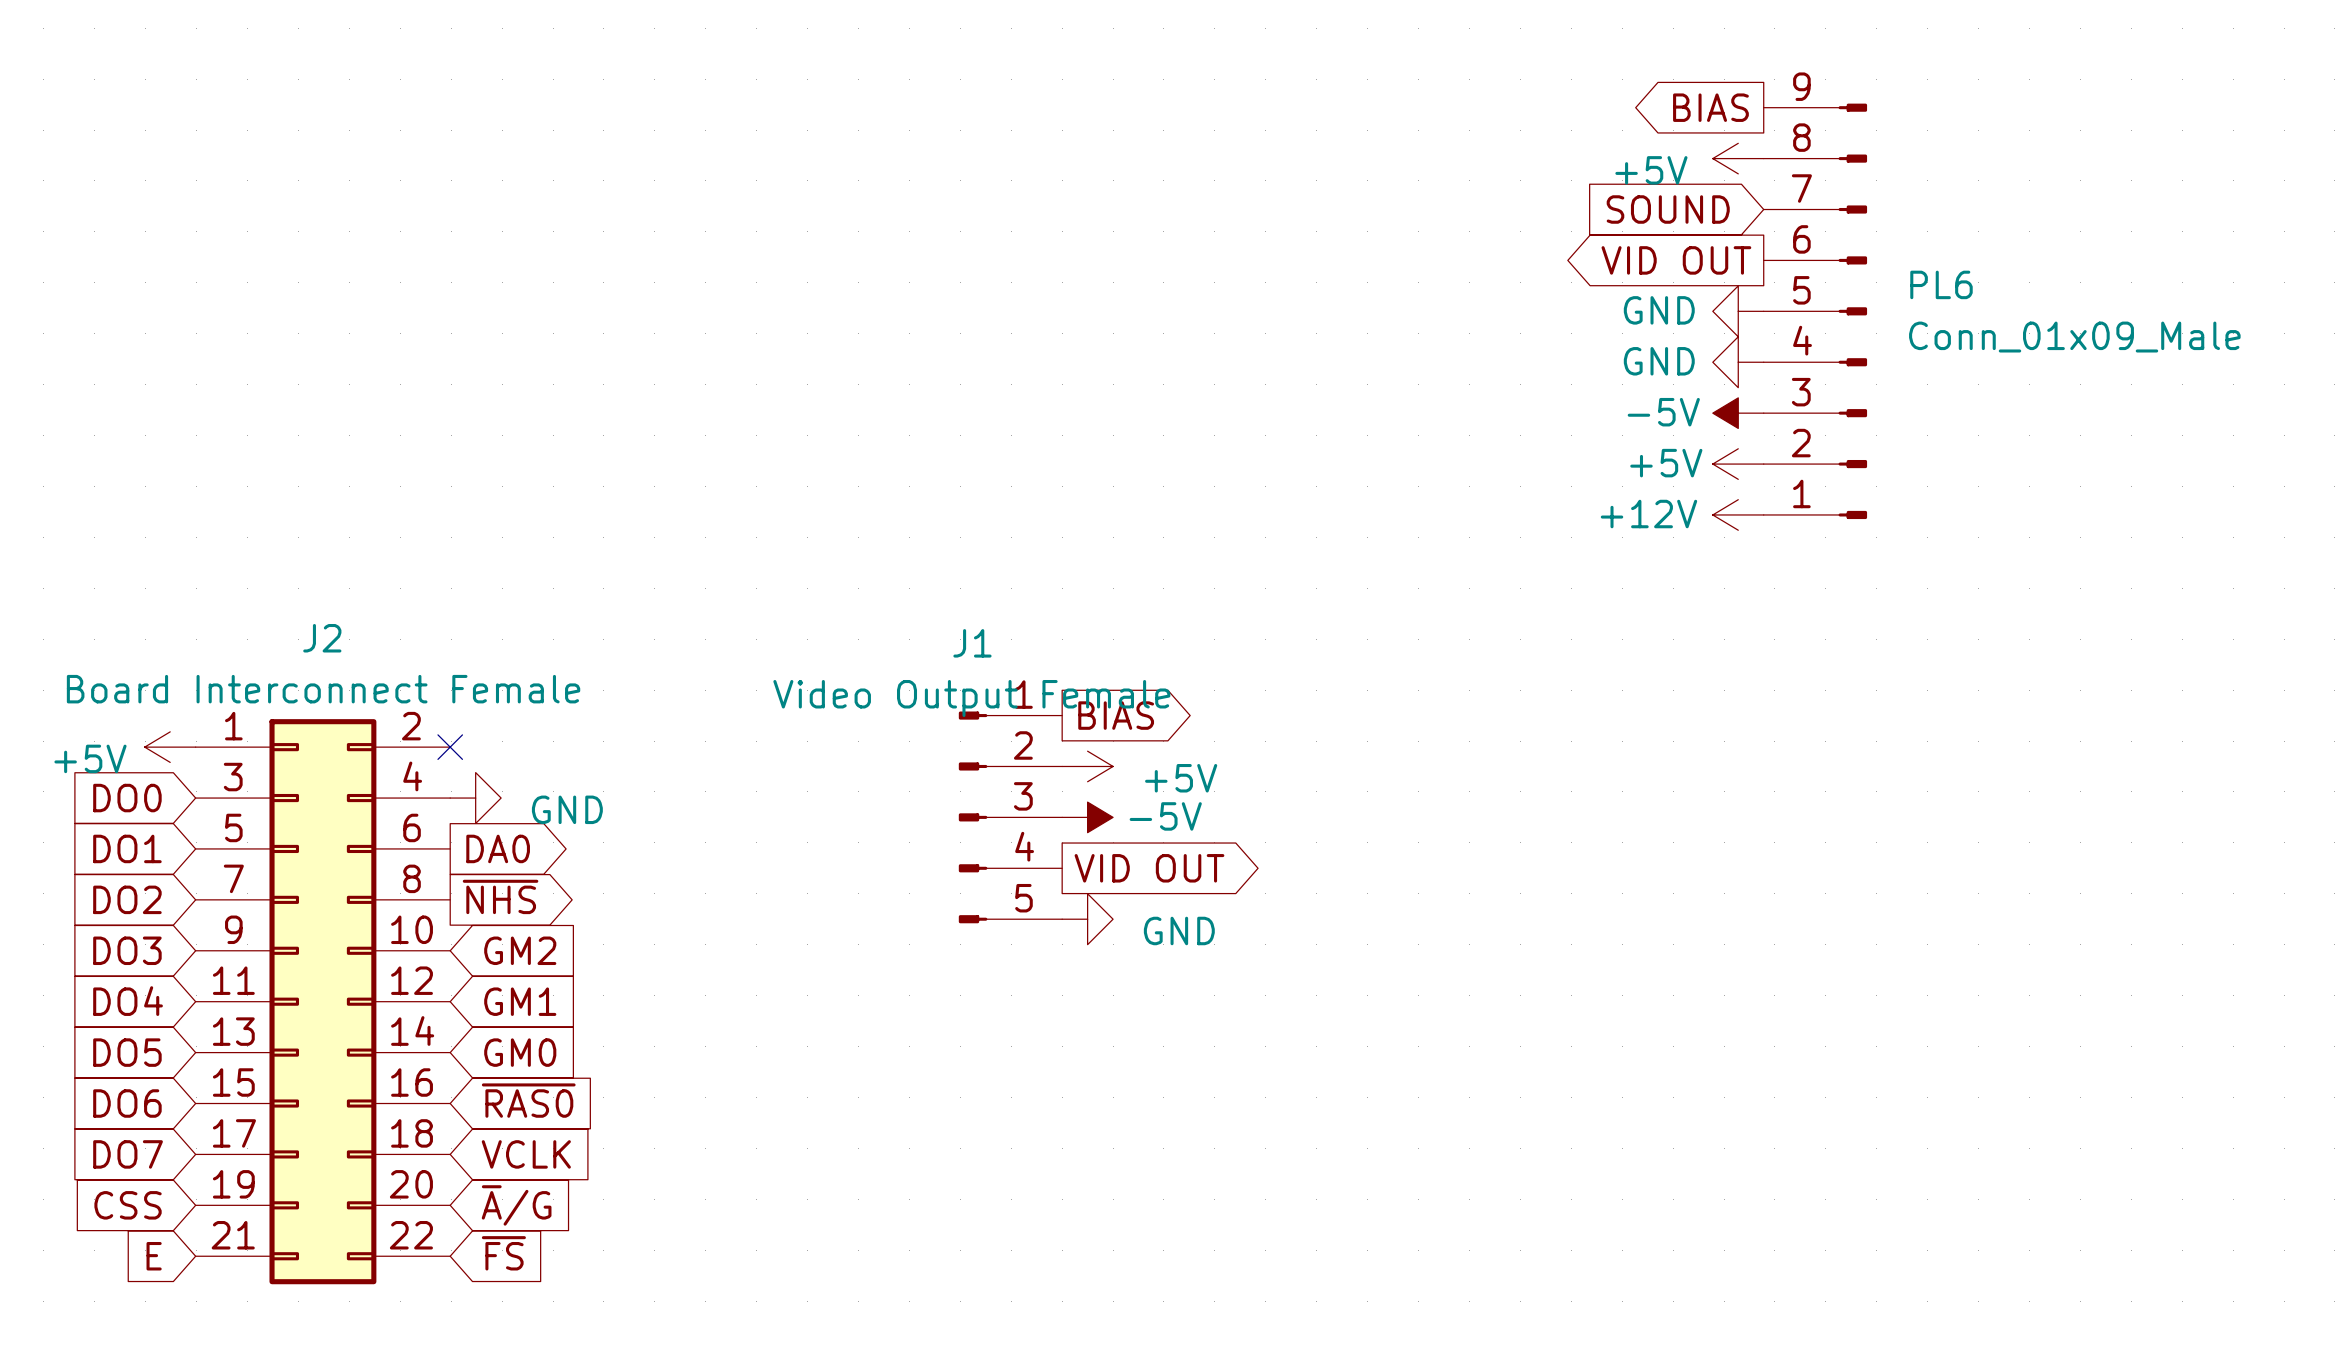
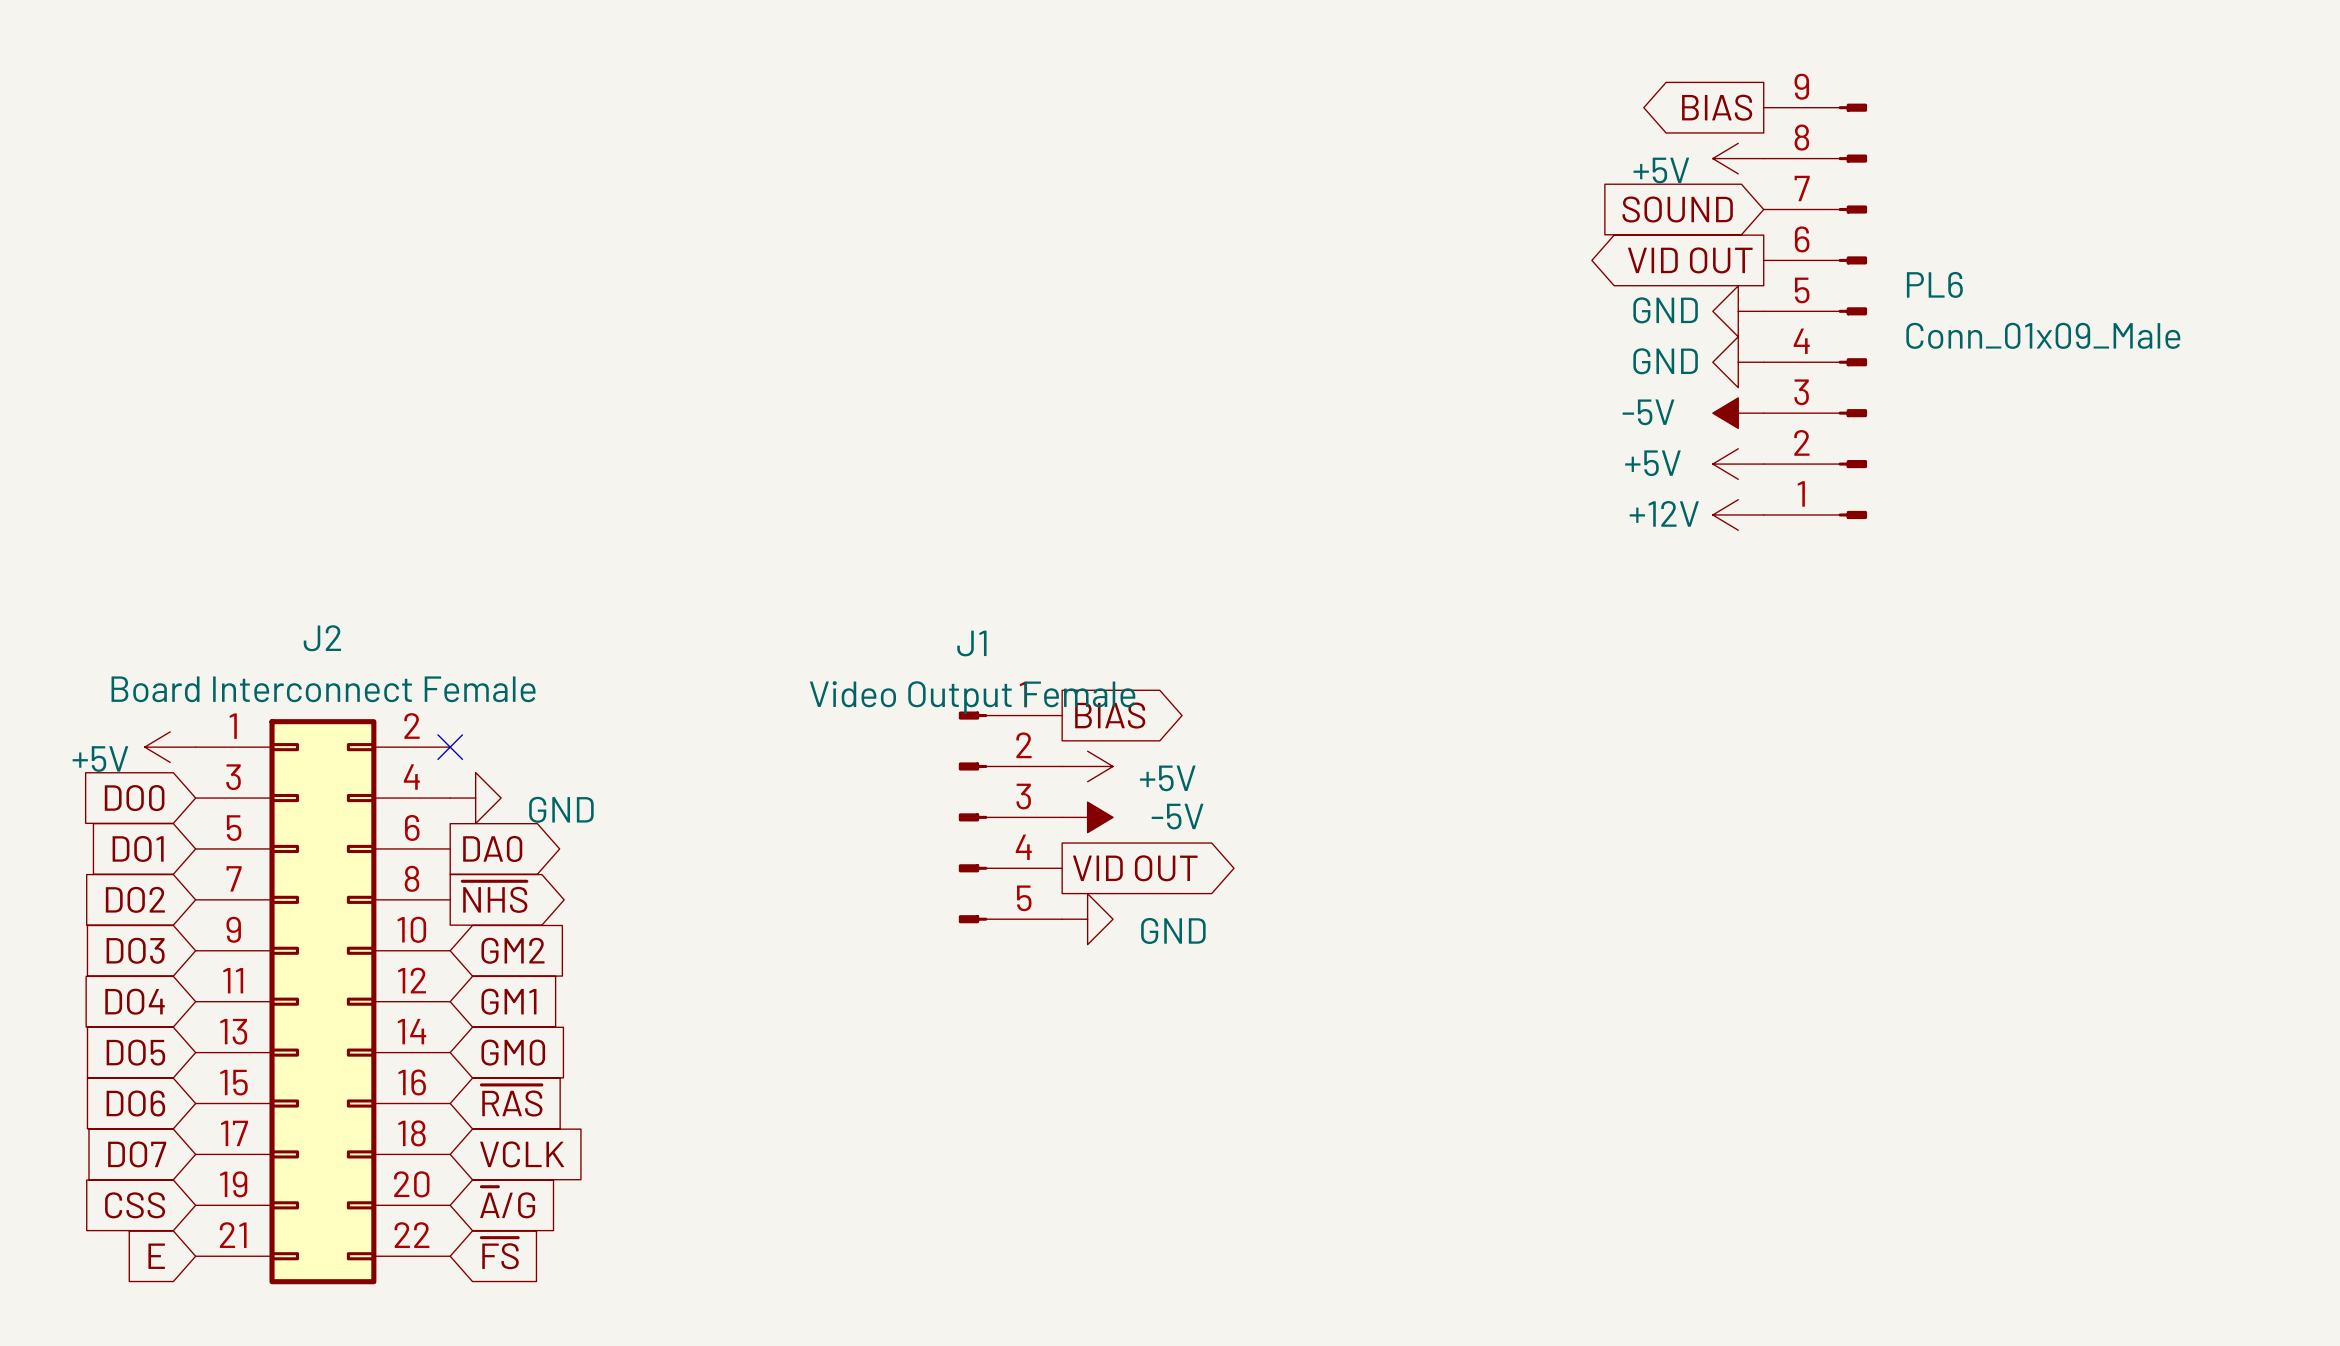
global label: ~{RAS0} (528, 1100) -> ~{RAS} (511, 1100)

